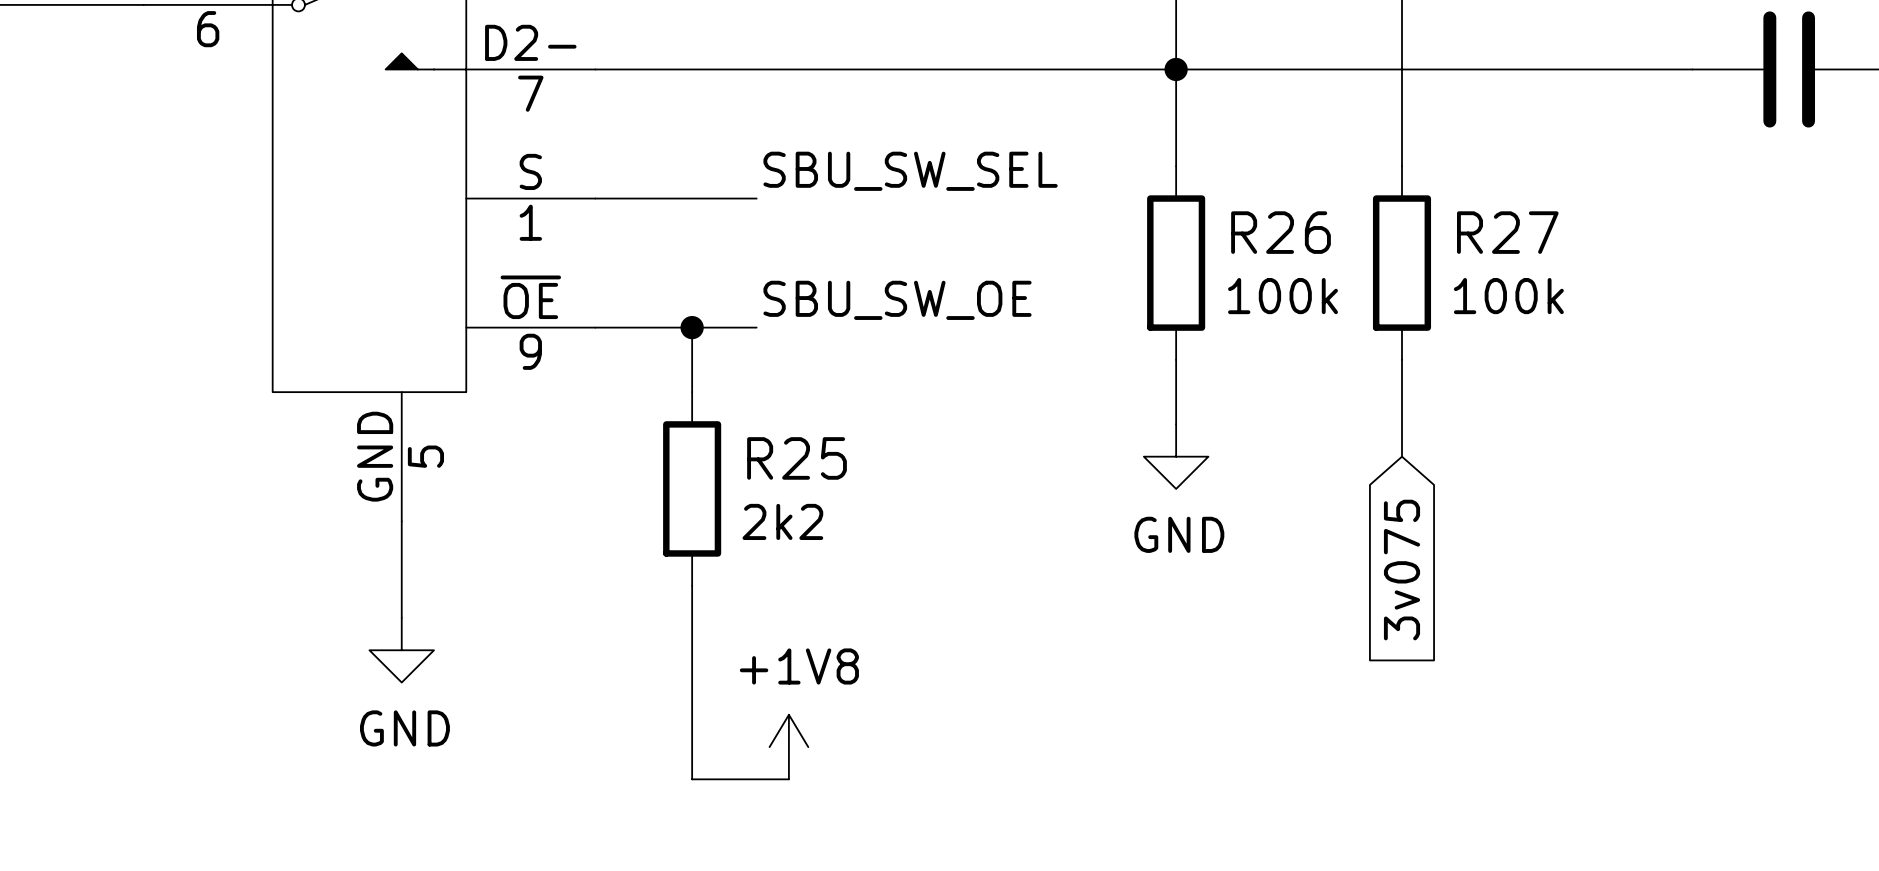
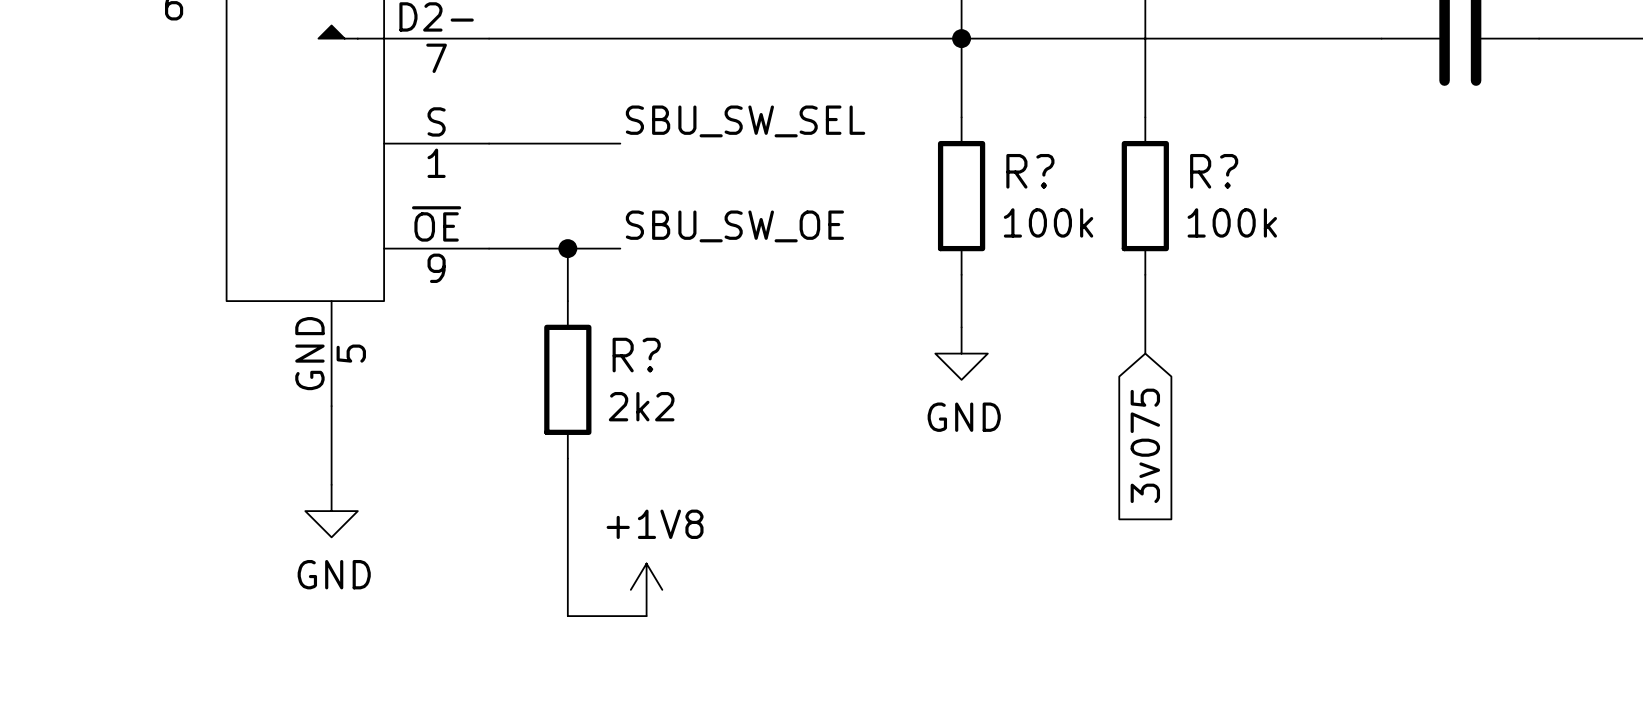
R26 name: R26 (1281, 232) -> R? (1030, 171)
R27 name: R27 (1507, 232) -> R? (1214, 171)
R25 name: R25 (797, 458) -> R? (636, 355)

